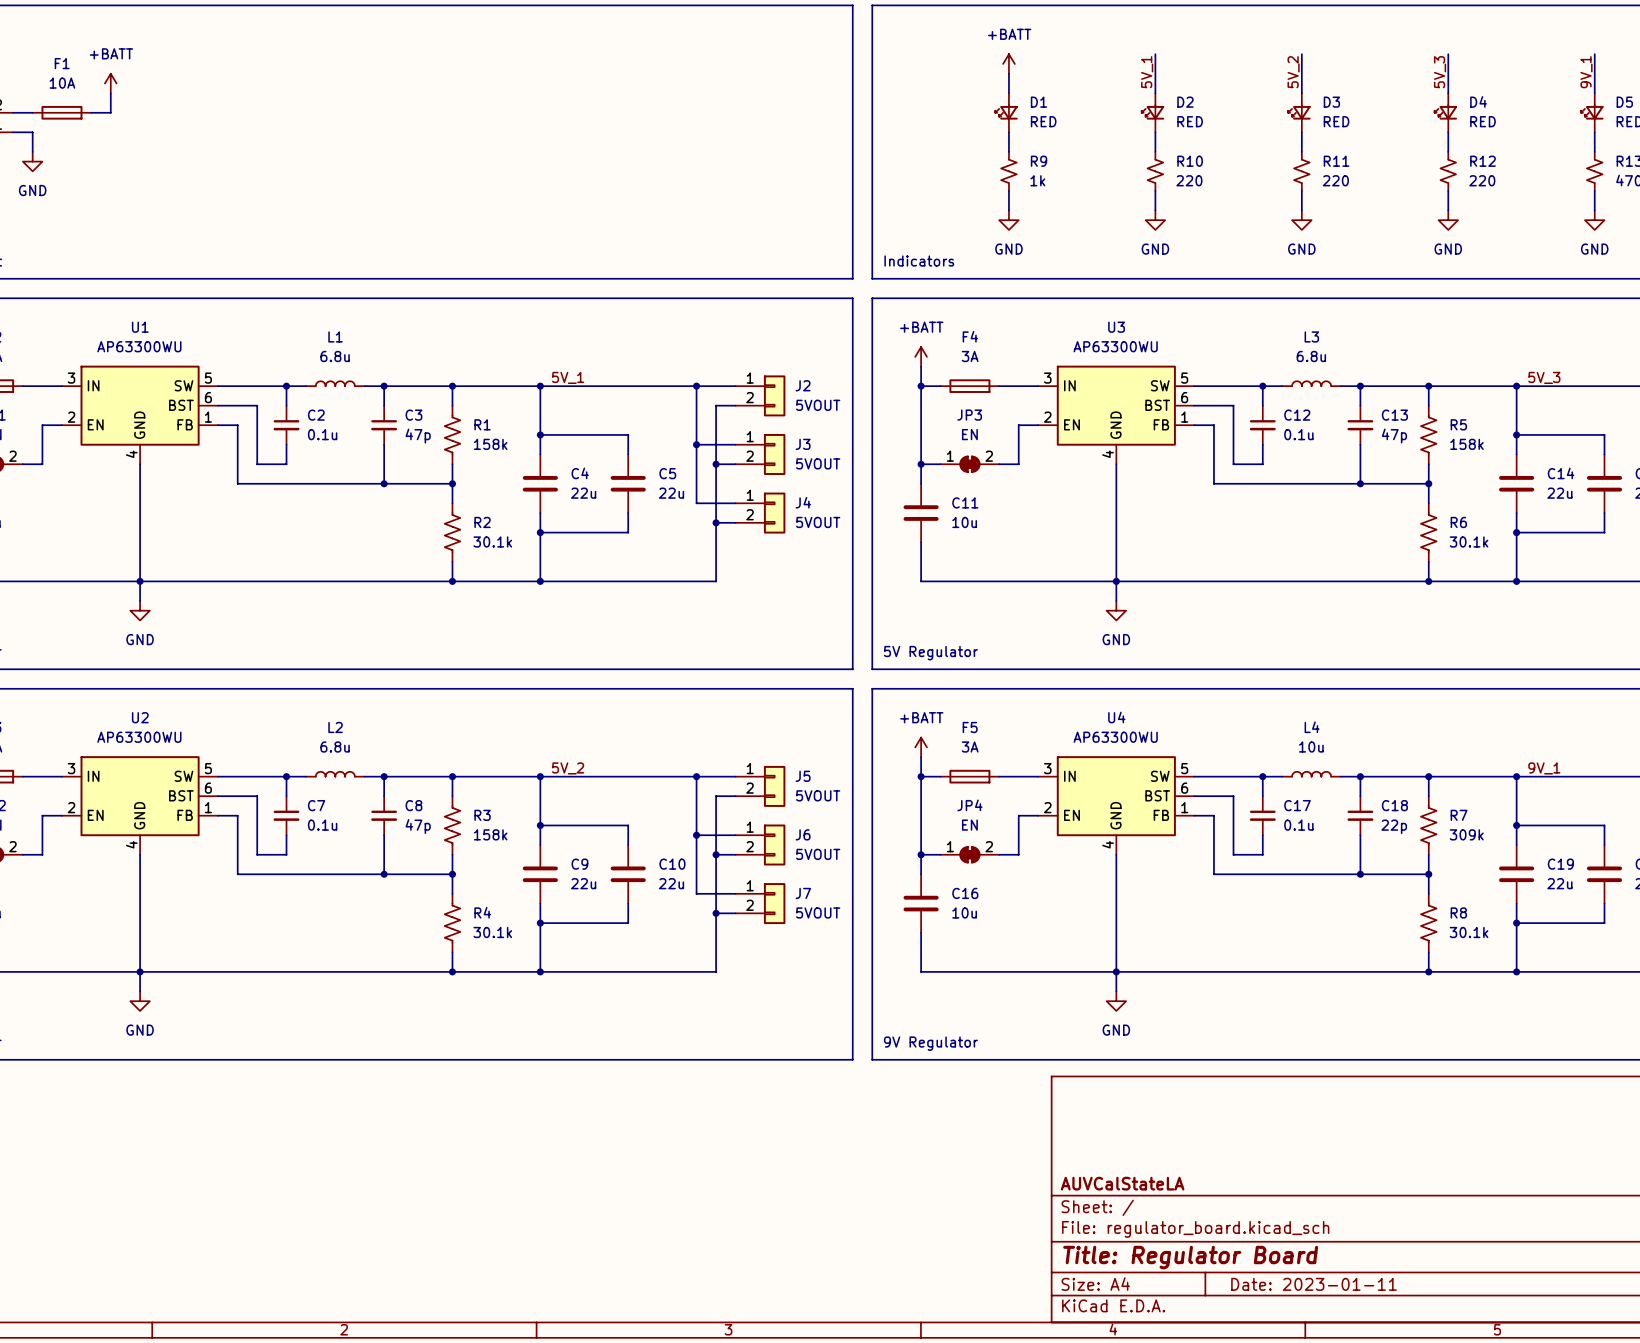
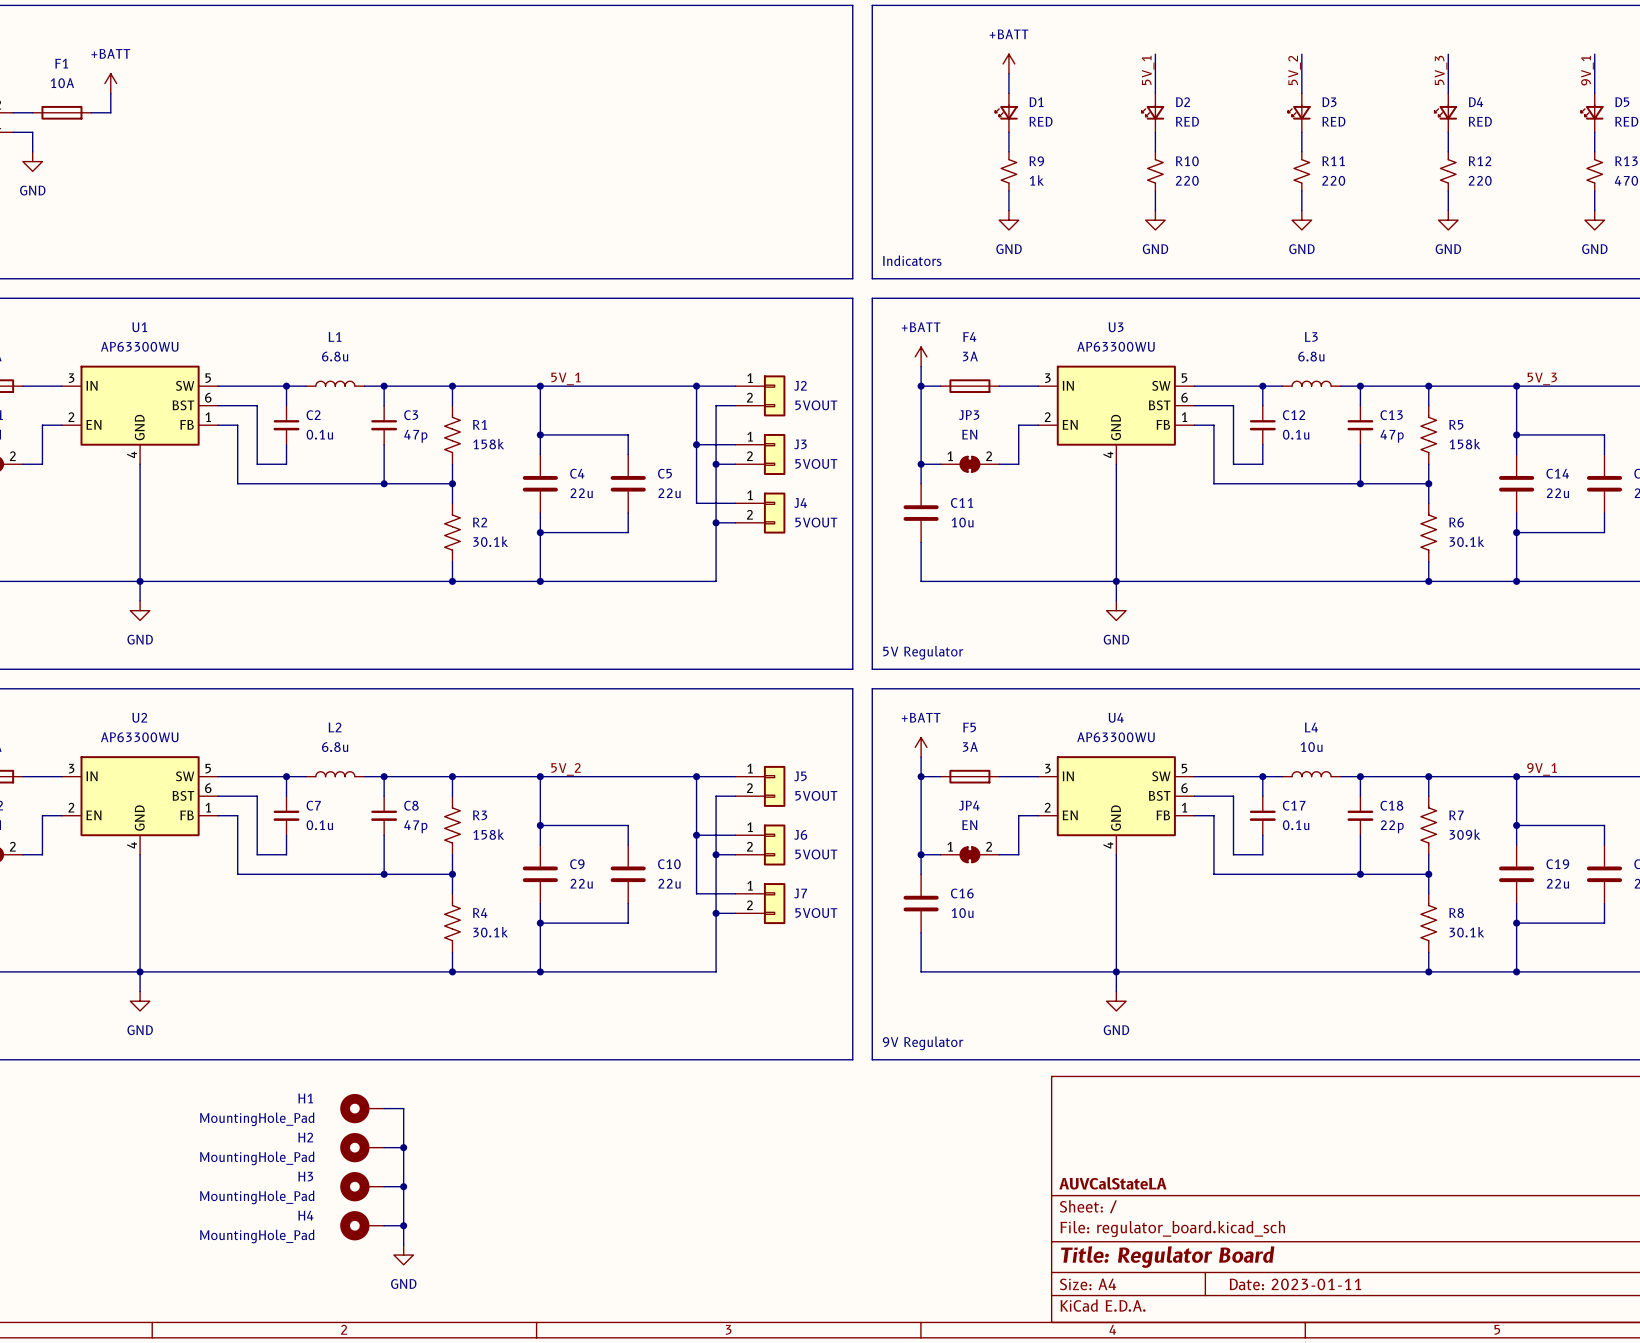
H1: none -> MountingHole_Pad (362, 1108)
wire: none -> (384, 1108) (403, 1108) (403, 1245)
H2: none -> MountingHole_Pad (362, 1147)
wire: none -> (384, 1147) (403, 1147)
junction: none -> (403, 1147)
H3: none -> MountingHole_Pad (362, 1186)
wire: none -> (384, 1186) (403, 1186)
junction: none -> (403, 1186)
H4: none -> MountingHole_Pad (362, 1225)
wire: none -> (384, 1225) (403, 1225)
junction: none -> (403, 1225)
power symbol: none -> GND (403, 1255)

